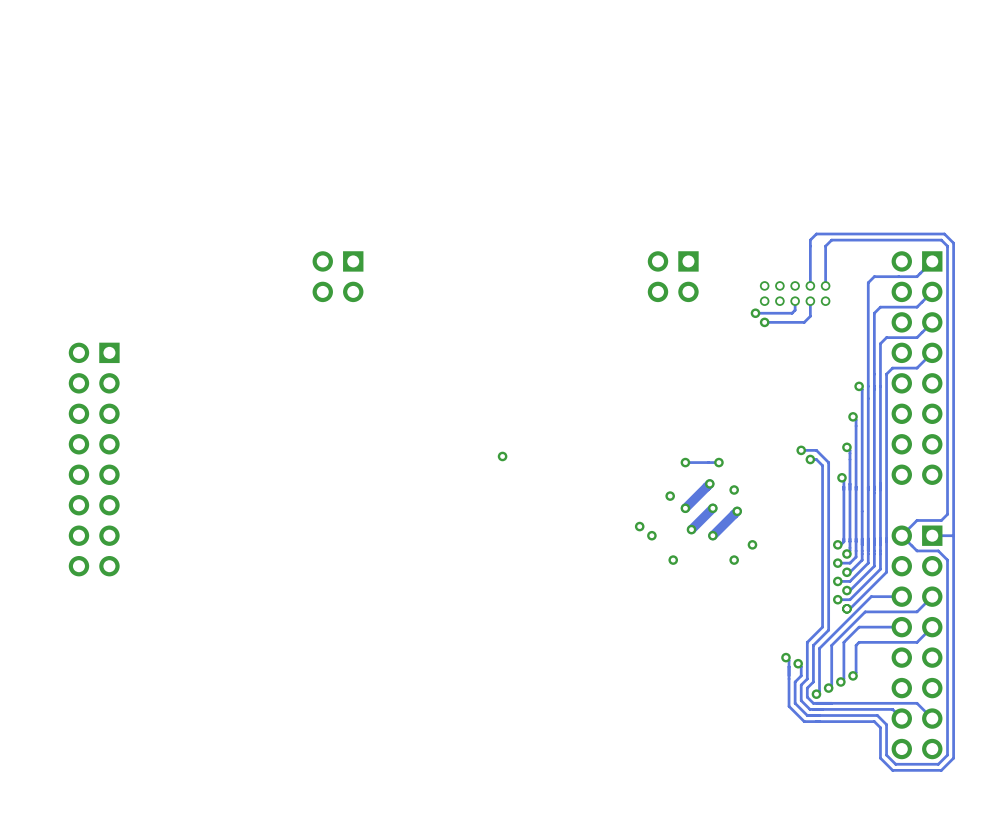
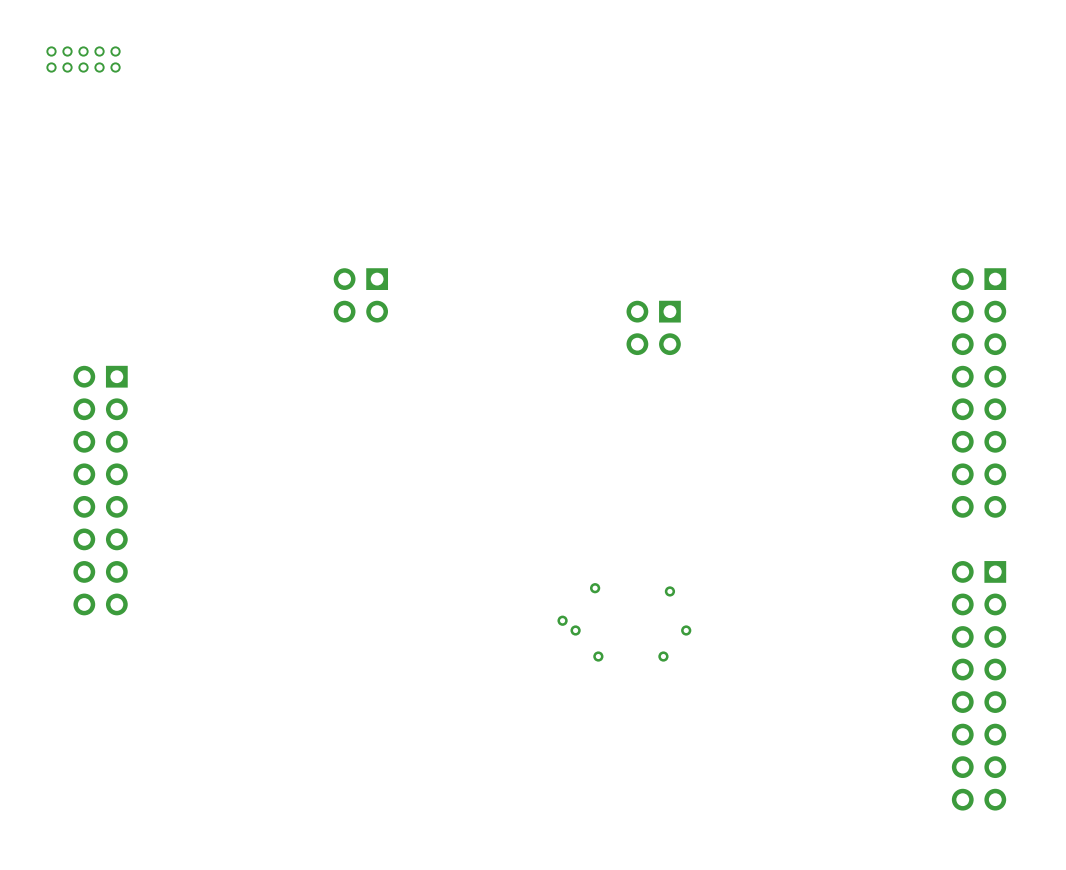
part: none -> (83, 59)
track: (932, 261) (917, 276) (874, 276) (868, 282) (868, 563) (849, 581) (837, 581) -> none
part position: (673, 276) -> (653, 327)
track: (810, 285) (810, 240) (816, 234) (944, 234) (953, 243) (953, 758) (941, 770) (892, 770) (880, 758) (880, 727) (874, 721) (804, 721) (789, 706) (789, 660) (785, 657) -> none
track: (825, 285) (825, 246) (831, 240) (941, 240) (947, 246) (947, 514) (941, 520) (917, 520) (901, 535) (917, 550) (938, 550) (947, 560) (947, 755) (938, 764) (895, 764) (886, 755) (886, 724) (877, 715) (807, 715) (795, 703) (795, 681) (801, 675) (801, 666) (798, 663) -> none
track: (932, 291) (917, 307) (880, 307) (874, 313) (874, 566) (849, 590) (846, 590) -> none
part: (795, 293) -> none
track: (795, 301) (795, 310) (792, 313) (755, 313) -> none
track: (810, 301) (810, 316) (804, 322) (764, 322) -> none
via: (755, 313) -> none
via: (764, 322) -> none
track: (932, 322) (917, 337) (886, 337) (880, 343) (880, 569) (849, 599) (837, 599) -> none
track: (932, 352) (917, 368) (892, 368) (886, 374) (886, 572) (849, 608) (846, 608) -> none
track: (859, 386) (862, 389) (862, 560) (849, 572) (846, 572) -> none
via: (859, 386) -> none
track: (853, 416) (856, 419) (856, 557) (849, 563) (837, 563) -> none
via: (853, 416) -> none
track: (846, 447) (849, 450) (849, 550) (846, 553) -> none
via: (846, 447) -> none
track: (801, 450) (816, 450) (828, 462) (828, 630) (813, 645) (813, 681) (807, 688) (807, 697) (813, 703) (917, 703) (932, 718) -> none
via: (801, 450) -> none
via: (502, 456) -> none
track: (810, 459) (816, 459) (822, 465) (822, 627) (807, 642) (807, 678) (801, 685) (801, 700) (809, 709) (892, 709) (901, 718) -> none
via: (810, 459) -> none
via: (685, 462) -> none
track: (718, 462) (685, 462) -> none
via: (718, 462) -> none
track: (841, 477) (843, 479) (843, 541) (837, 544) -> none
via: (841, 477) -> none
track: (709, 483) (685, 508) -> none
via: (709, 483) -> none
via: (734, 489) -> none
via: (670, 496) -> none
via: (685, 508) -> none
track: (712, 508) (691, 529) -> none
via: (712, 508) -> none
track: (737, 511) (712, 535) -> none
via: (737, 511) -> none
via: (639, 526) -> none
via: (691, 529) -> none
via: (651, 535) -> none
via: (712, 535) -> none
track: (953, 535) (932, 535) -> none
via: (752, 544) -> none
via: (837, 544) -> none
via: none -> (595, 588)
via: none -> (669, 591)
via: (846, 553) -> none
via: (673, 560) -> none
via: (734, 560) -> none
via: (837, 563) -> none
via: (846, 572) -> none
via: none -> (562, 620)
via: (837, 581) -> none
via: none -> (575, 630)
via: none -> (686, 630)
via: (846, 590) -> none
track: (901, 596) (871, 596) (819, 648) (819, 691) (816, 694) -> none
track: (932, 596) (917, 611) (865, 611) (831, 645) (831, 685) (828, 688) -> none
via: (837, 599) -> none
via: (846, 608) -> none
via: none -> (598, 656)
via: none -> (663, 656)
track: (901, 627) (859, 627) (843, 642) (843, 678) (840, 681) -> none
track: (932, 627) (917, 642) (859, 642) (856, 645) (856, 672) (853, 675) -> none
via: (785, 657) -> none
via: (798, 663) -> none
via: (853, 675) -> none
via: (840, 681) -> none
via: (828, 688) -> none
via: (816, 694) -> none

